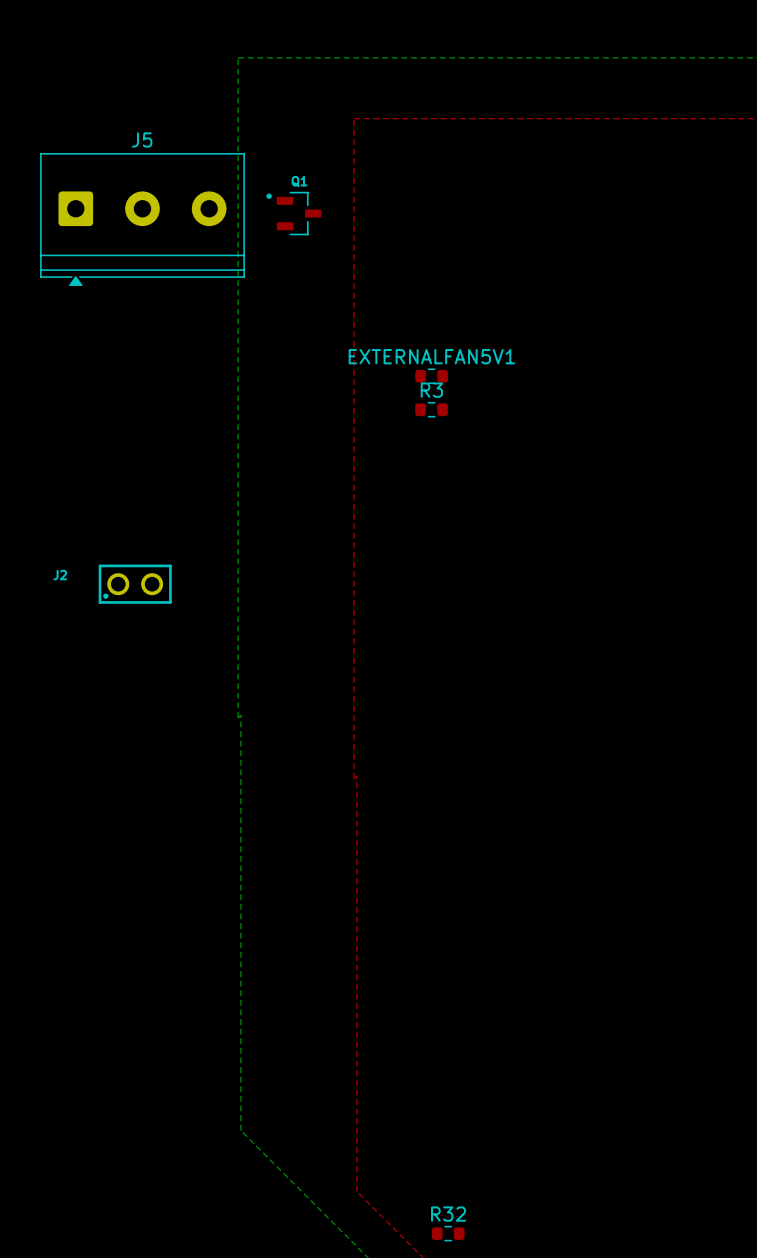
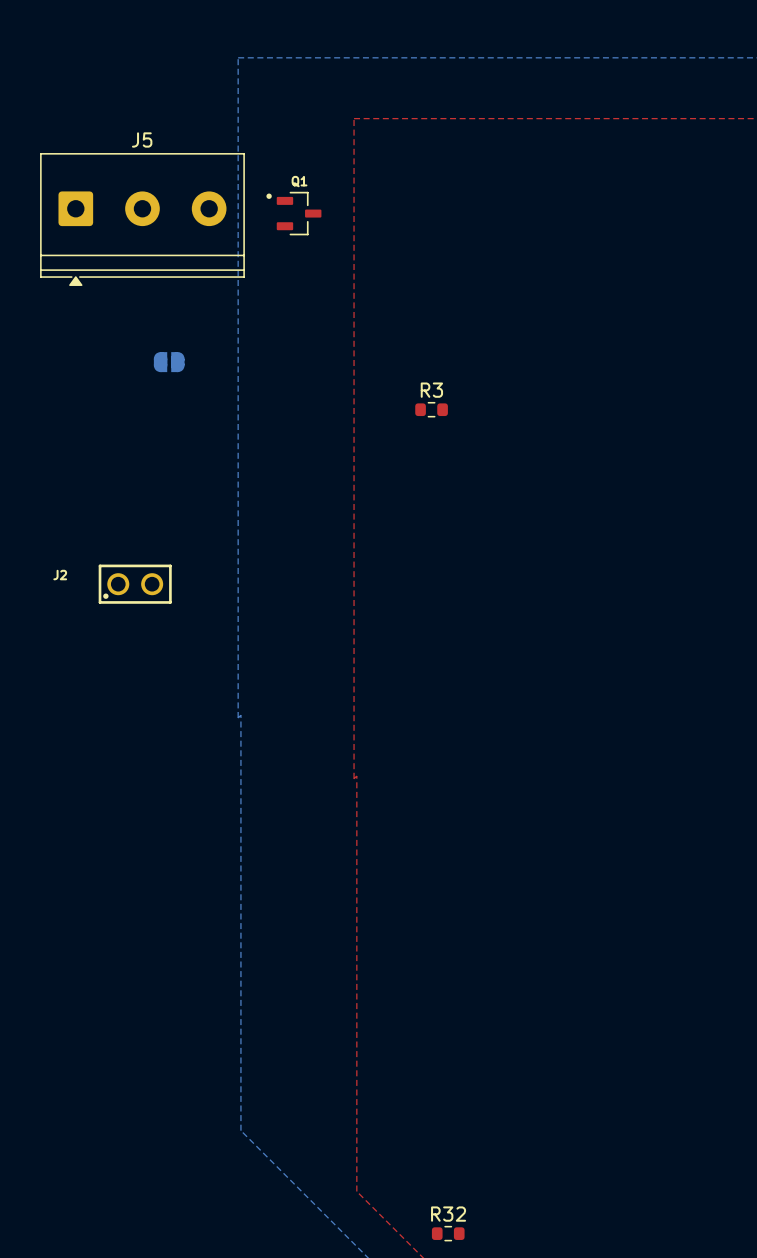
part: none -> (169, 362)
EXTERNALFAN5V1: (431, 376) -> none

